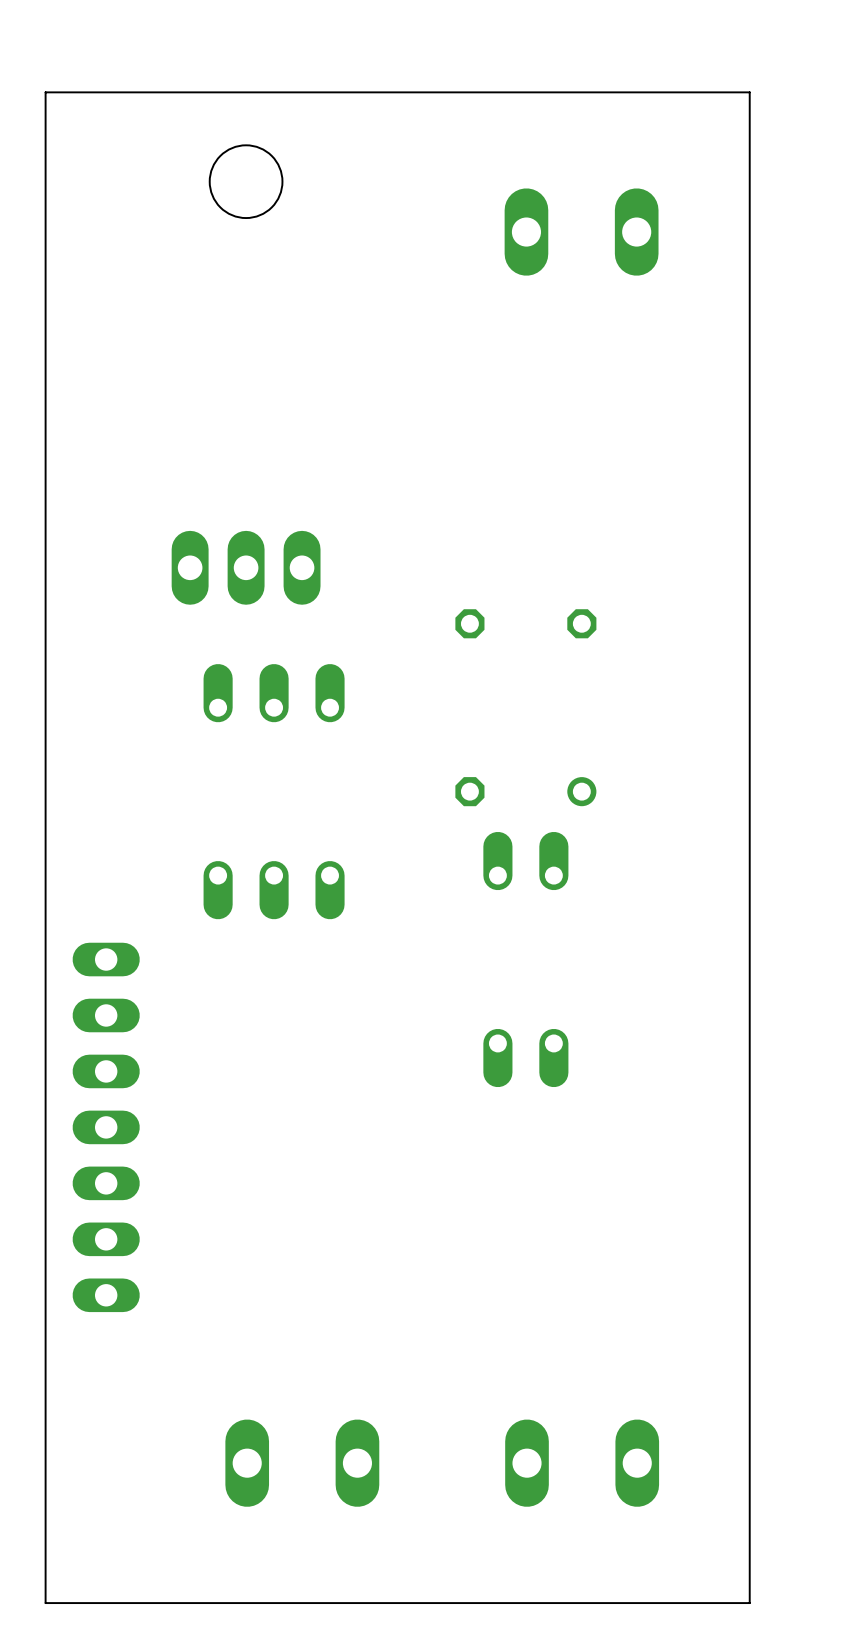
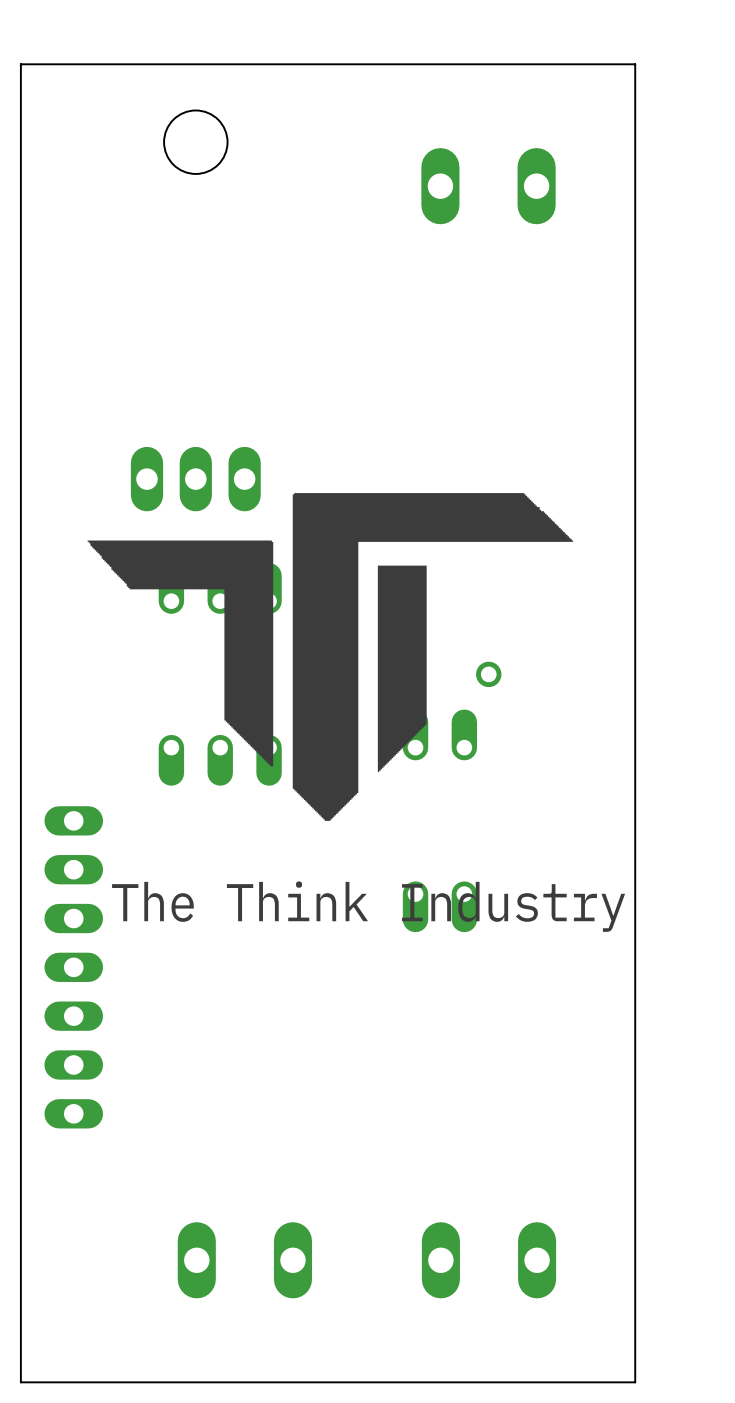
drawing: none -> [87, 493, 574, 821]
text: none -> The Think Industry (368, 906)

